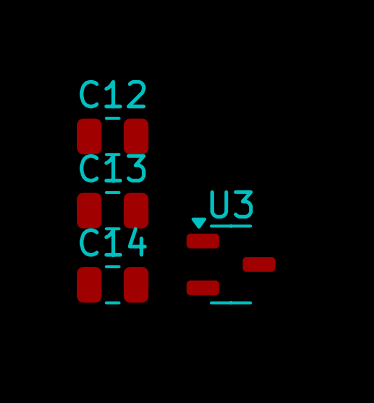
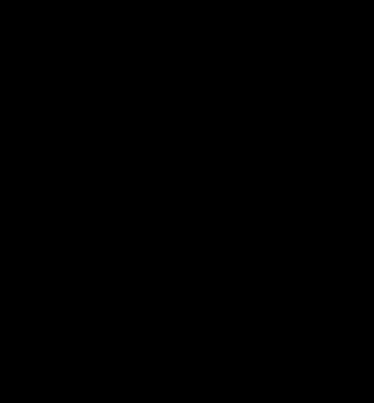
C12: (112, 136) -> none
C13: (112, 210) -> none
U3: (230, 261) -> none
C14: (112, 284) -> none

